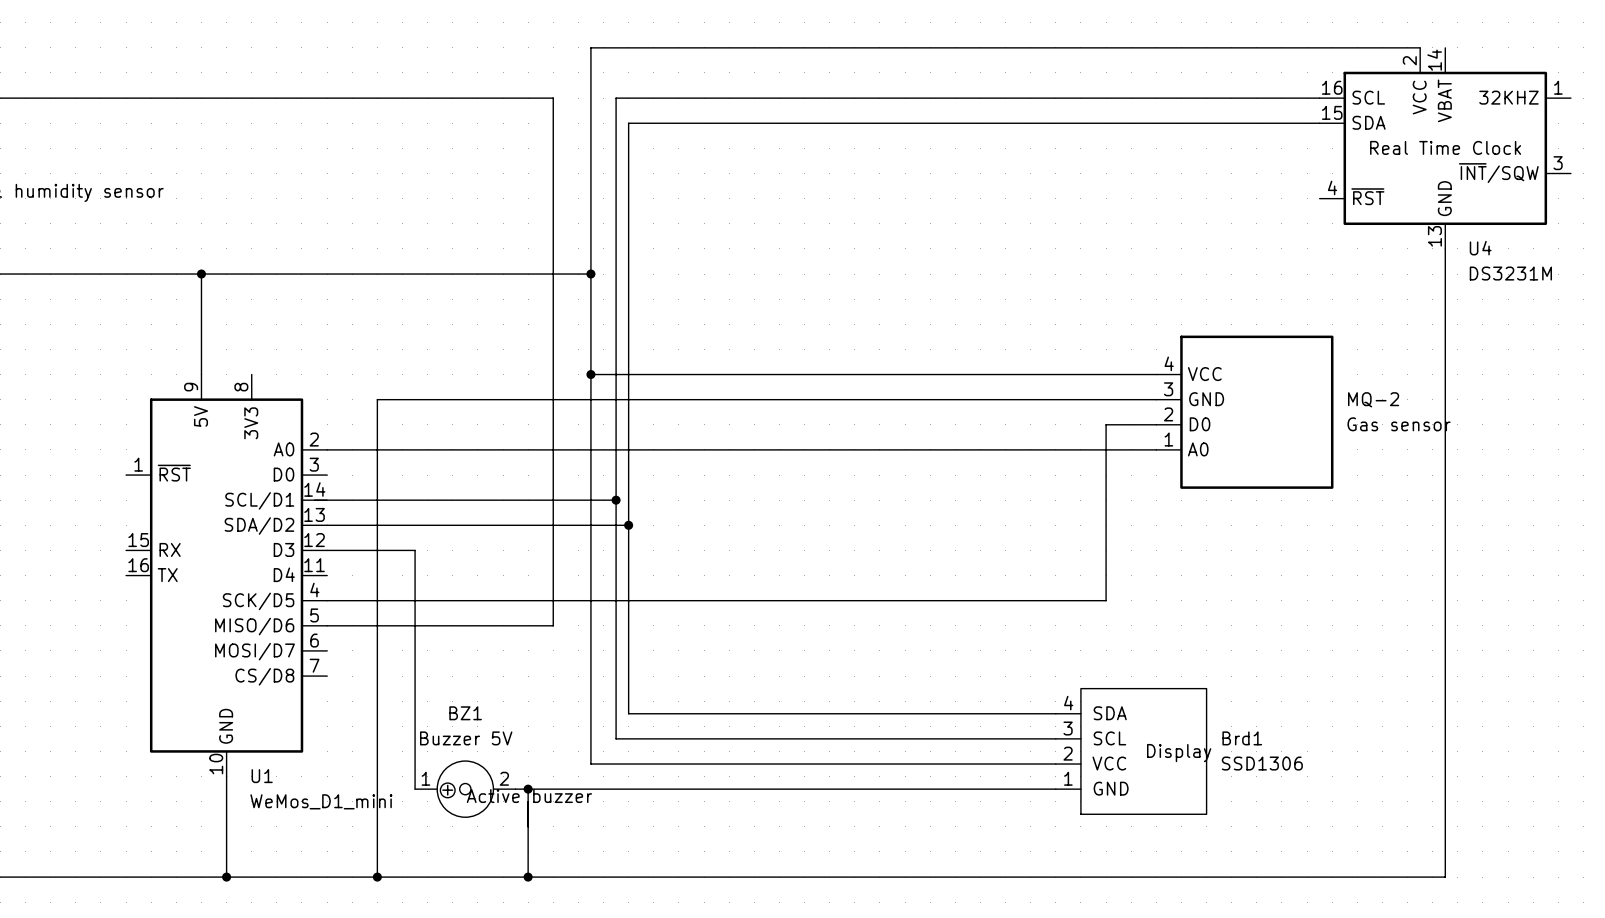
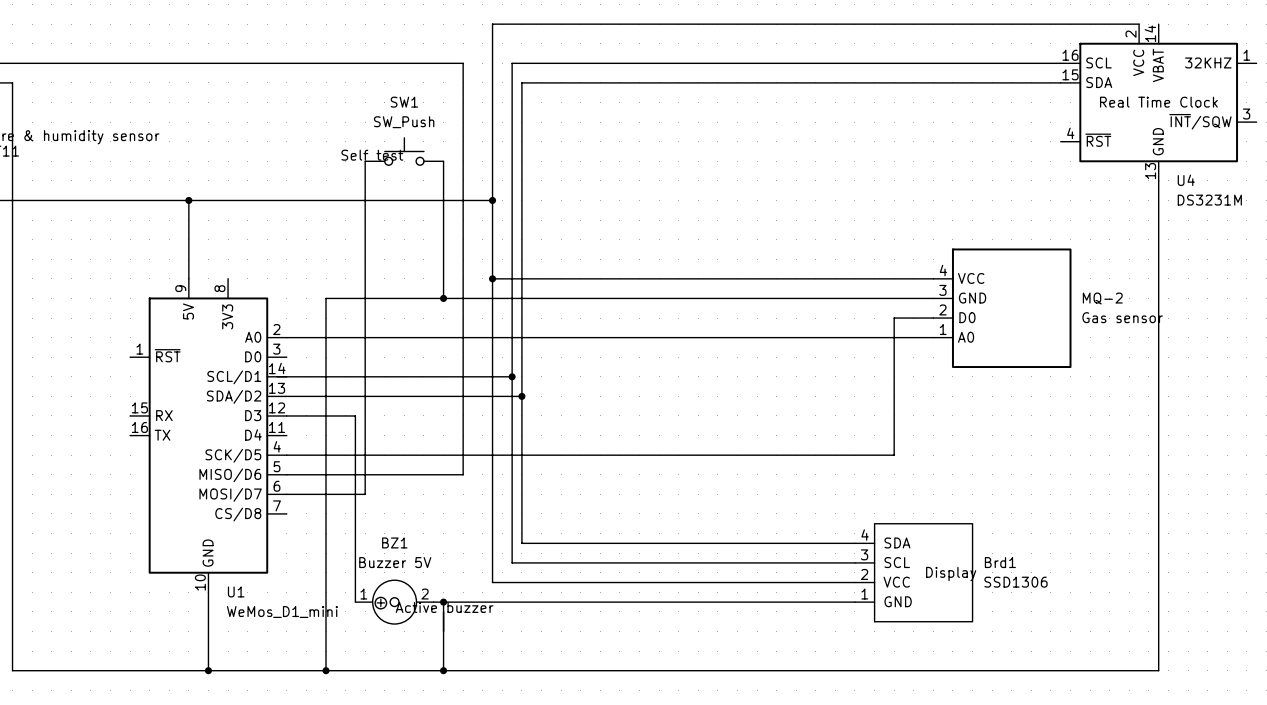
SW1: none -> SW_Push (404, 151)
wire: none -> (365, 161) (365, 494) (286, 494)
wire: none -> (443, 161) (443, 298)
junction: none -> (443, 298)

